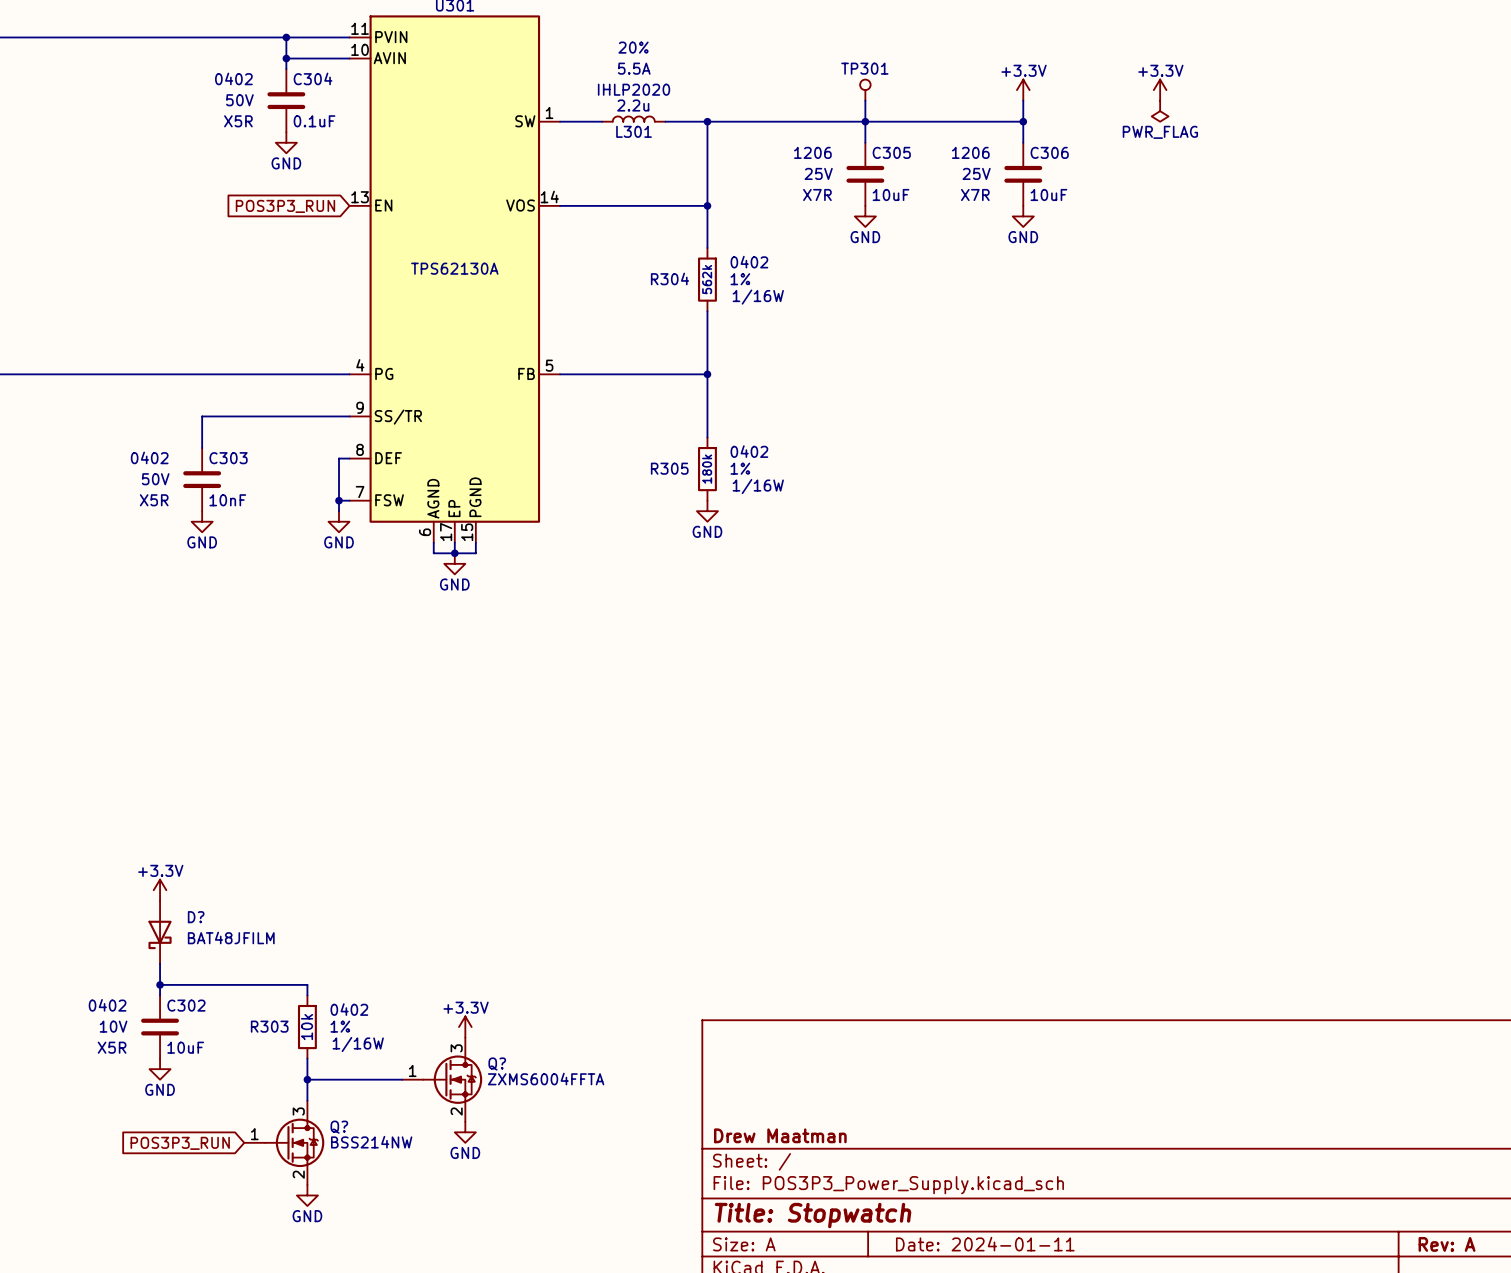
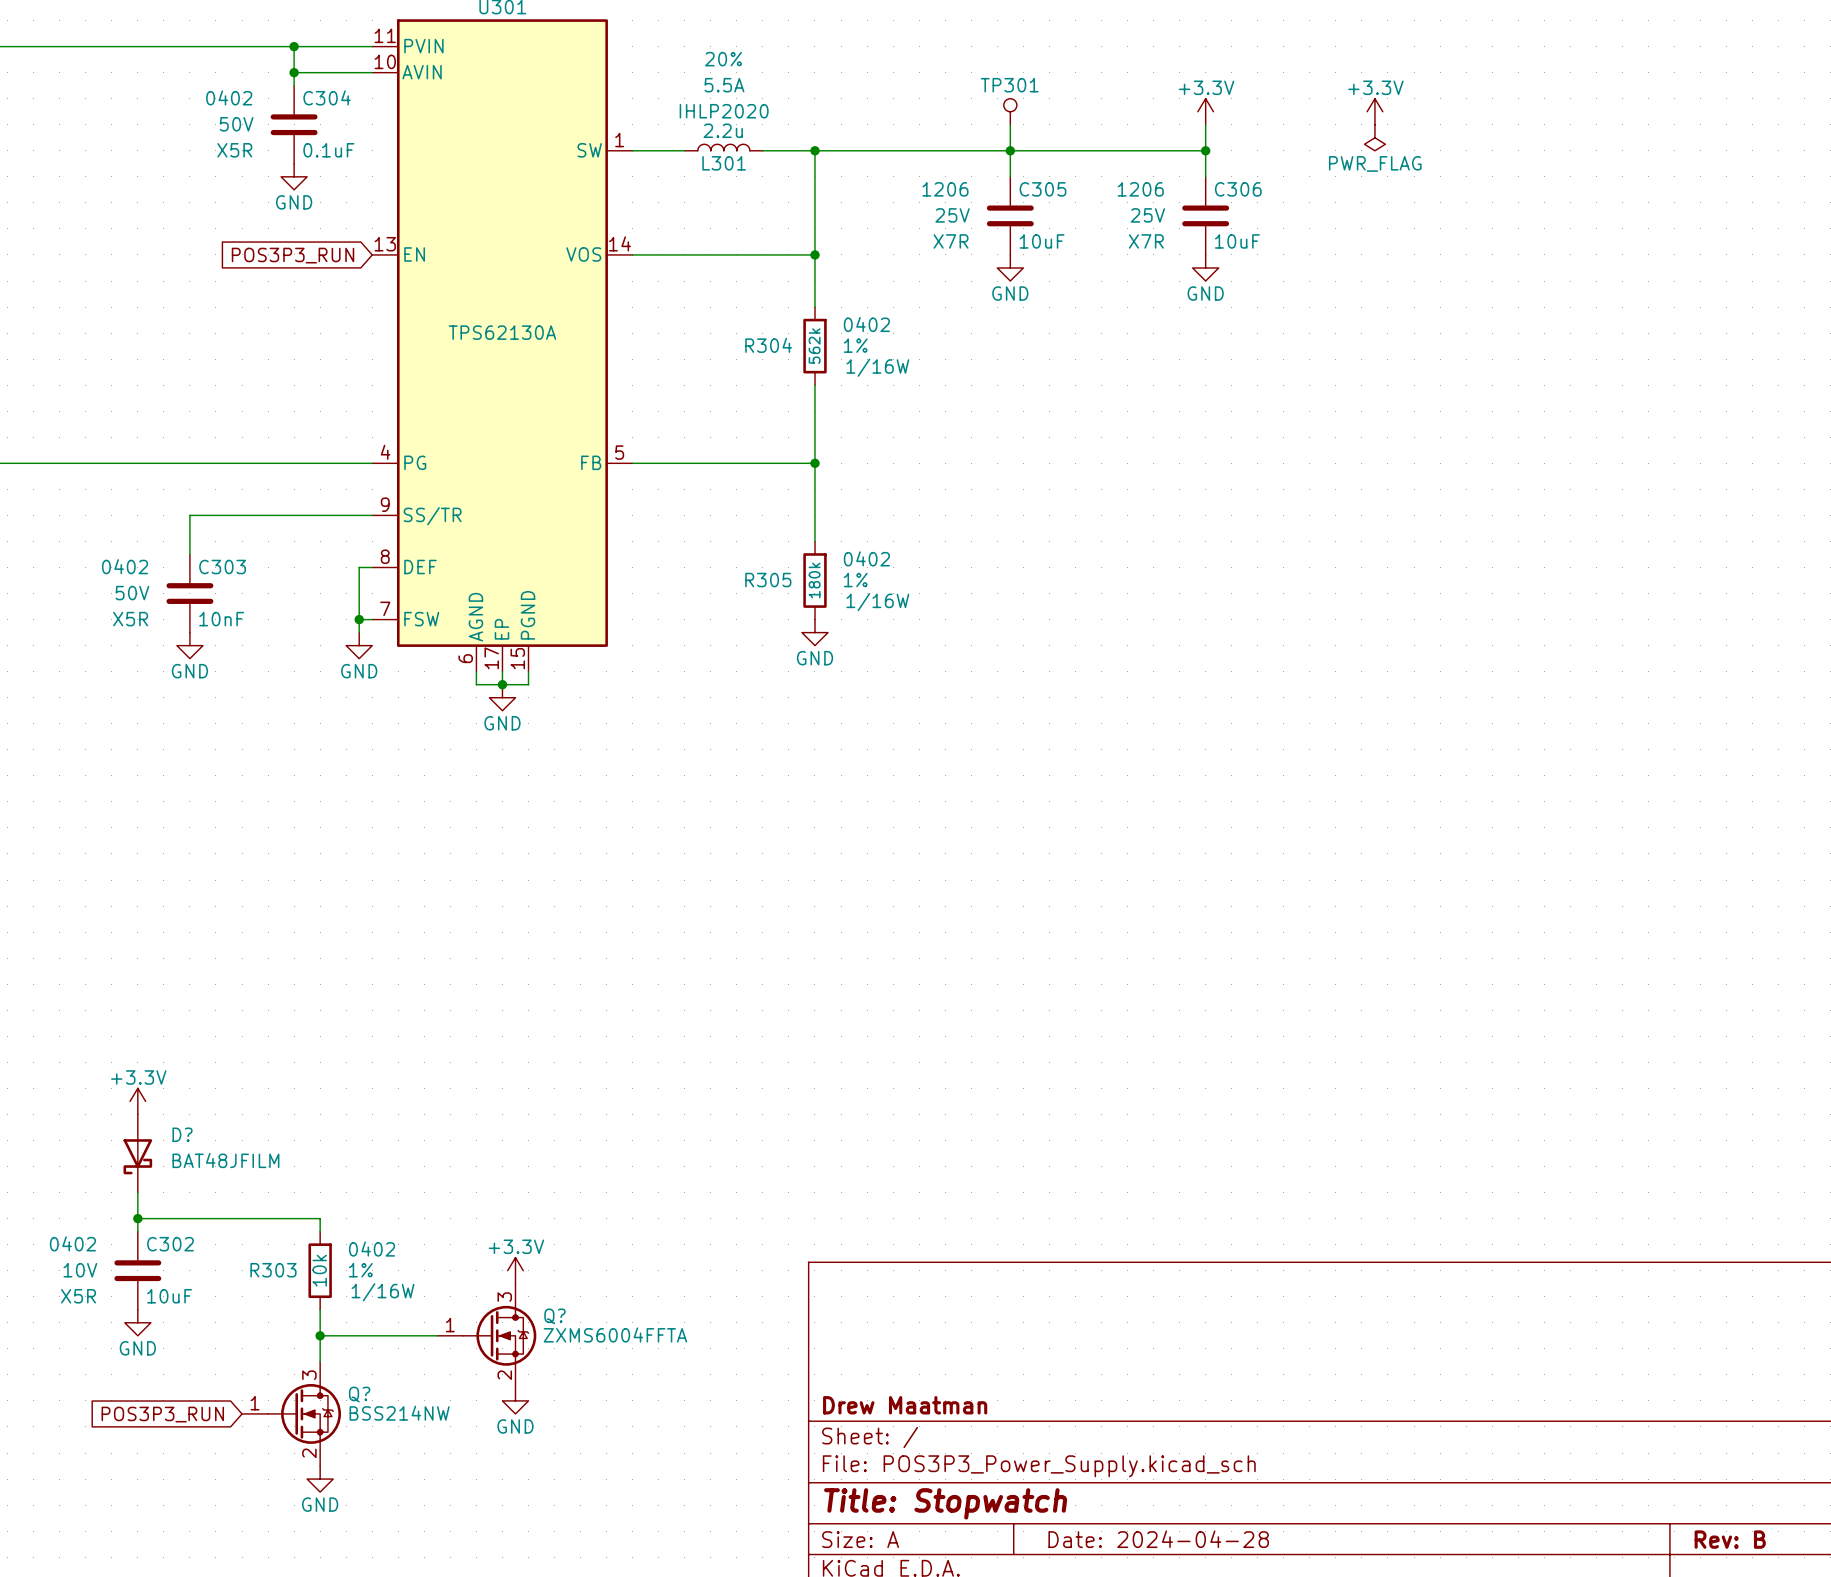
title block: Date: 2024-01-11 (985, 1244) -> Date: 2024-04-28 (1158, 1539)
title block: Rev: A (1447, 1244) -> Rev: B (1730, 1539)

